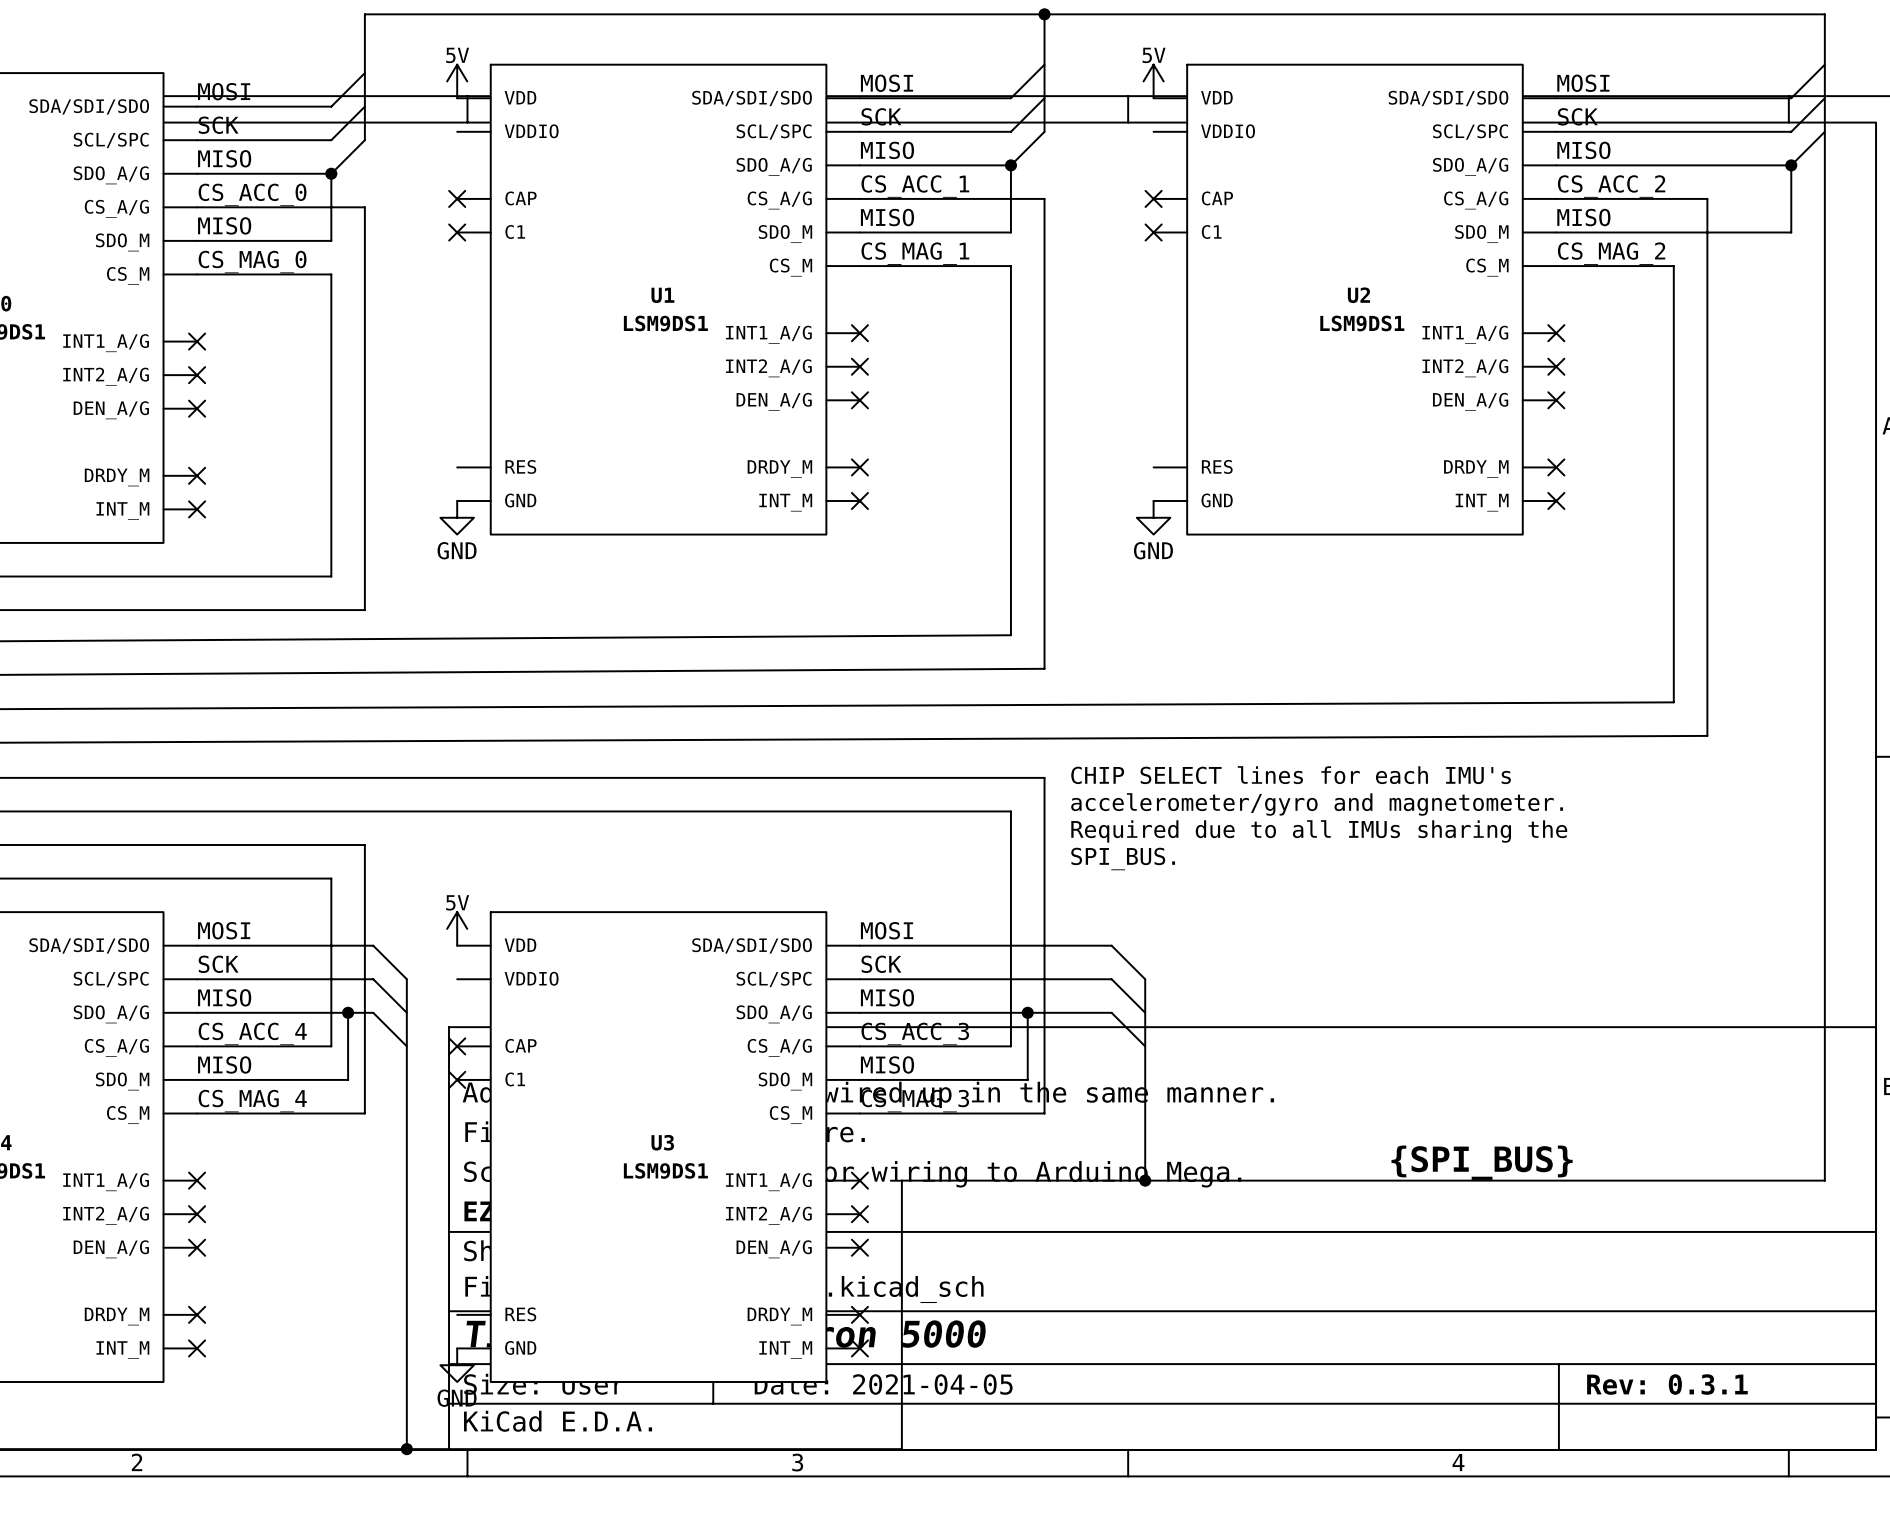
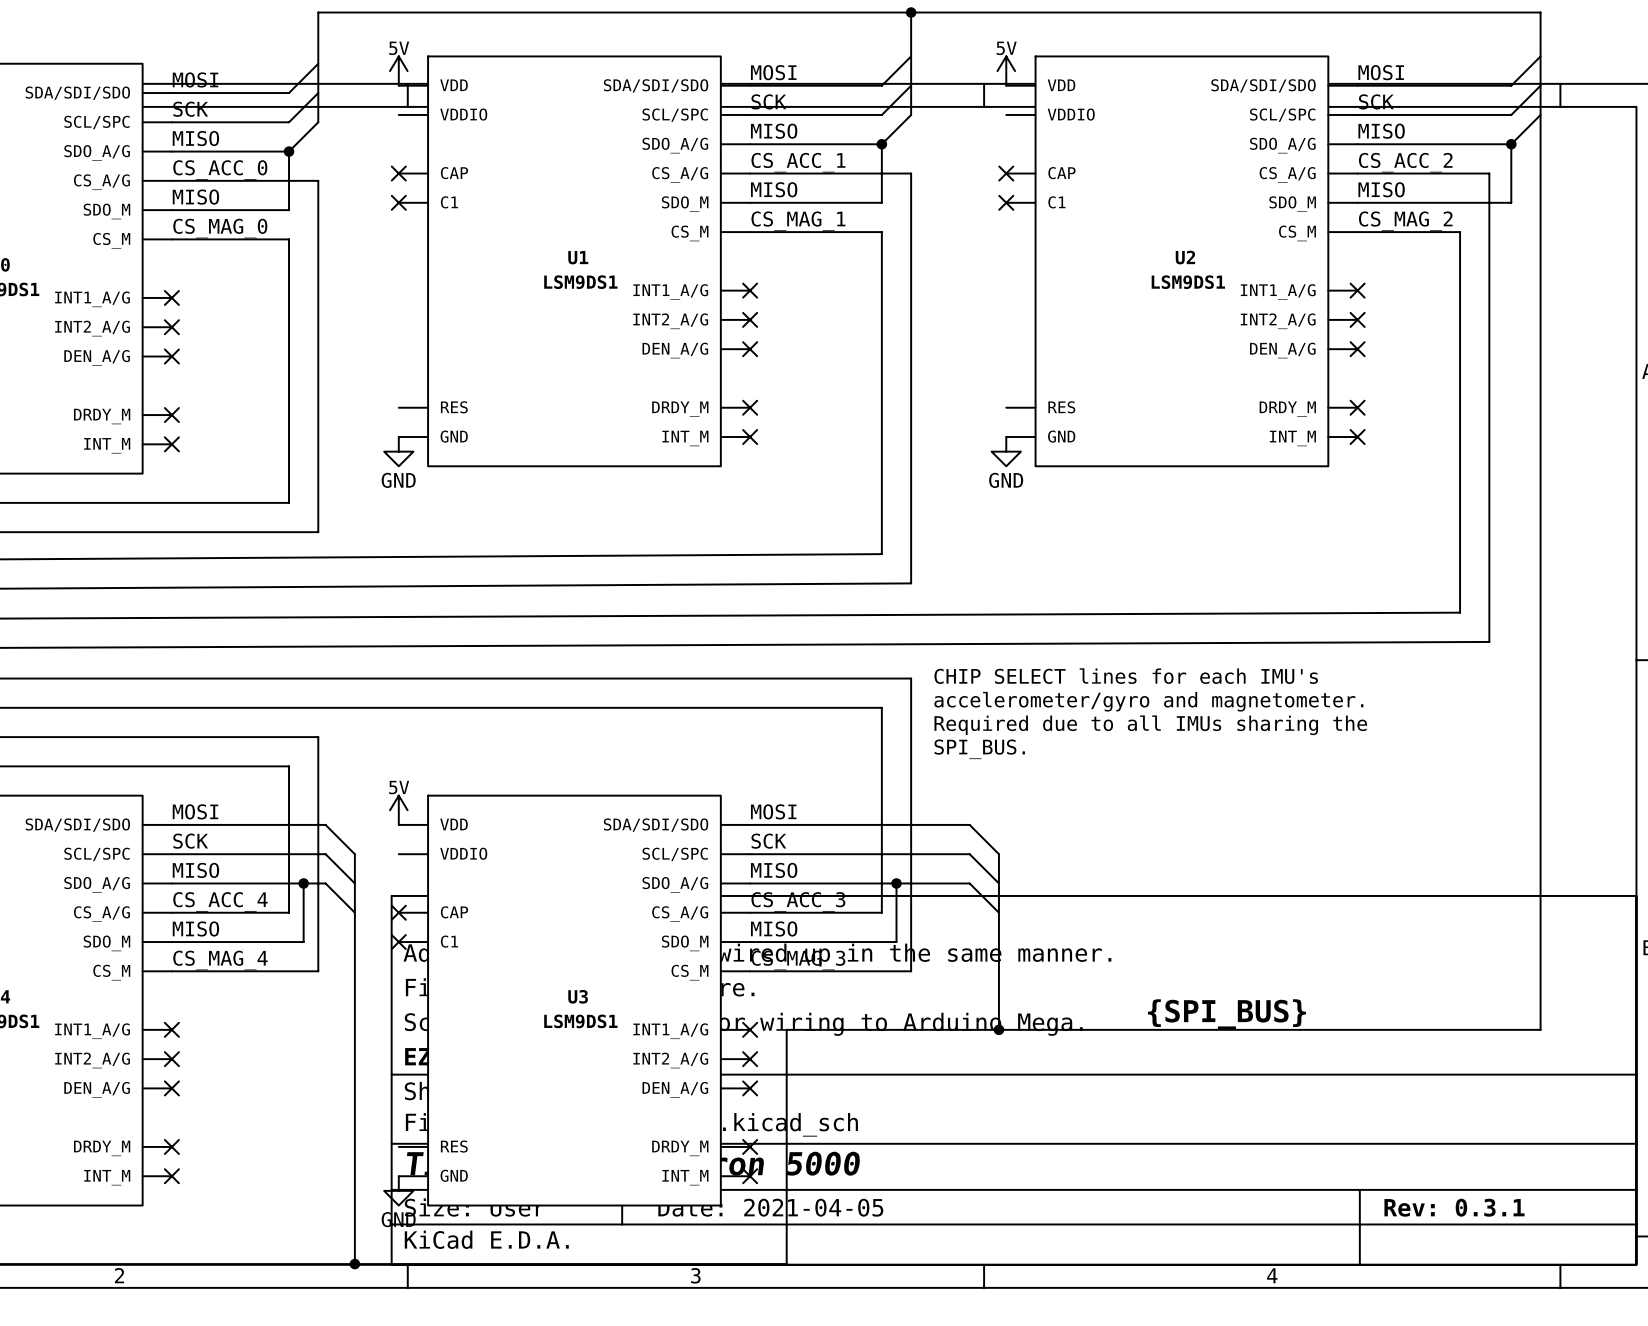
bus: (1766, 14) (1824, 14) (1824, 1180) (1766, 1180) -> (1540, 12) (1540, 1029)
wire: (1824, 64) (1791, 98) (1732, 98) -> (1540, 56) (1511, 85)
wire: (1824, 98) (1791, 131) (1732, 131) -> (1540, 85) (1511, 114)
wire: (1824, 131) (1791, 165) -> none
wire: (1732, 165) (1791, 165) -> none
wire: (1791, 165) (1791, 232) (1732, 232) -> (1540, 114) (1511, 144) (1511, 202)
junction position: (1791, 165) -> (1511, 144)
label position: {SPI_BUS} (1482, 1162) -> {SPI_BUS} (1226, 1014)

